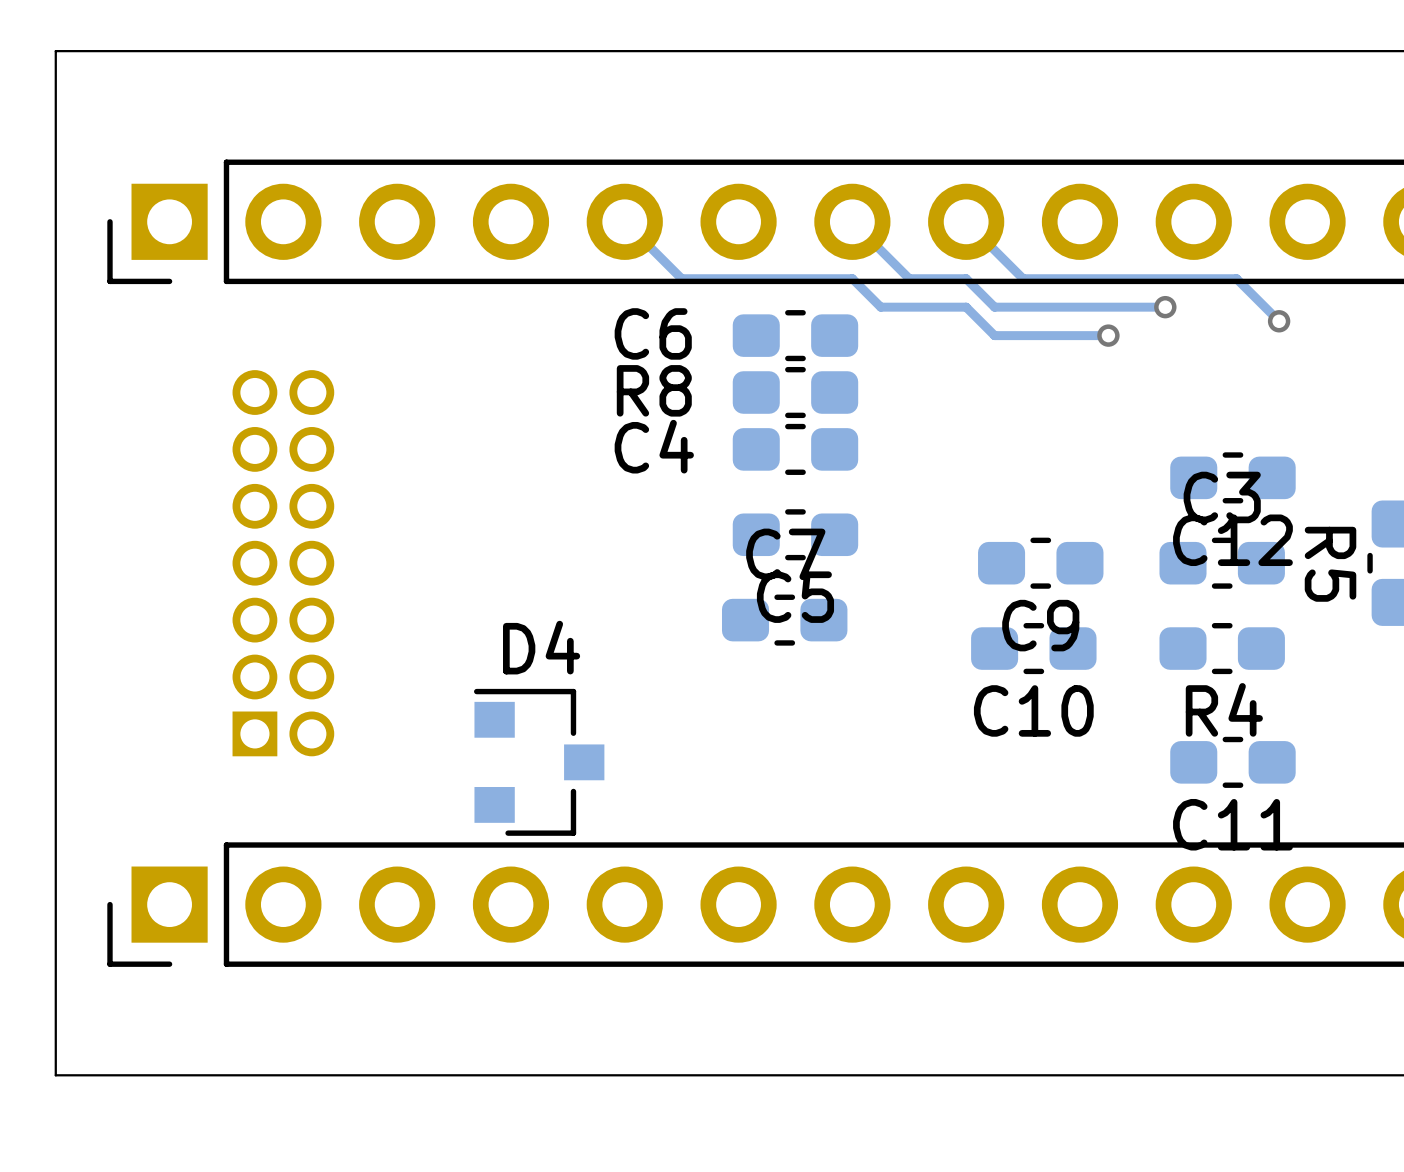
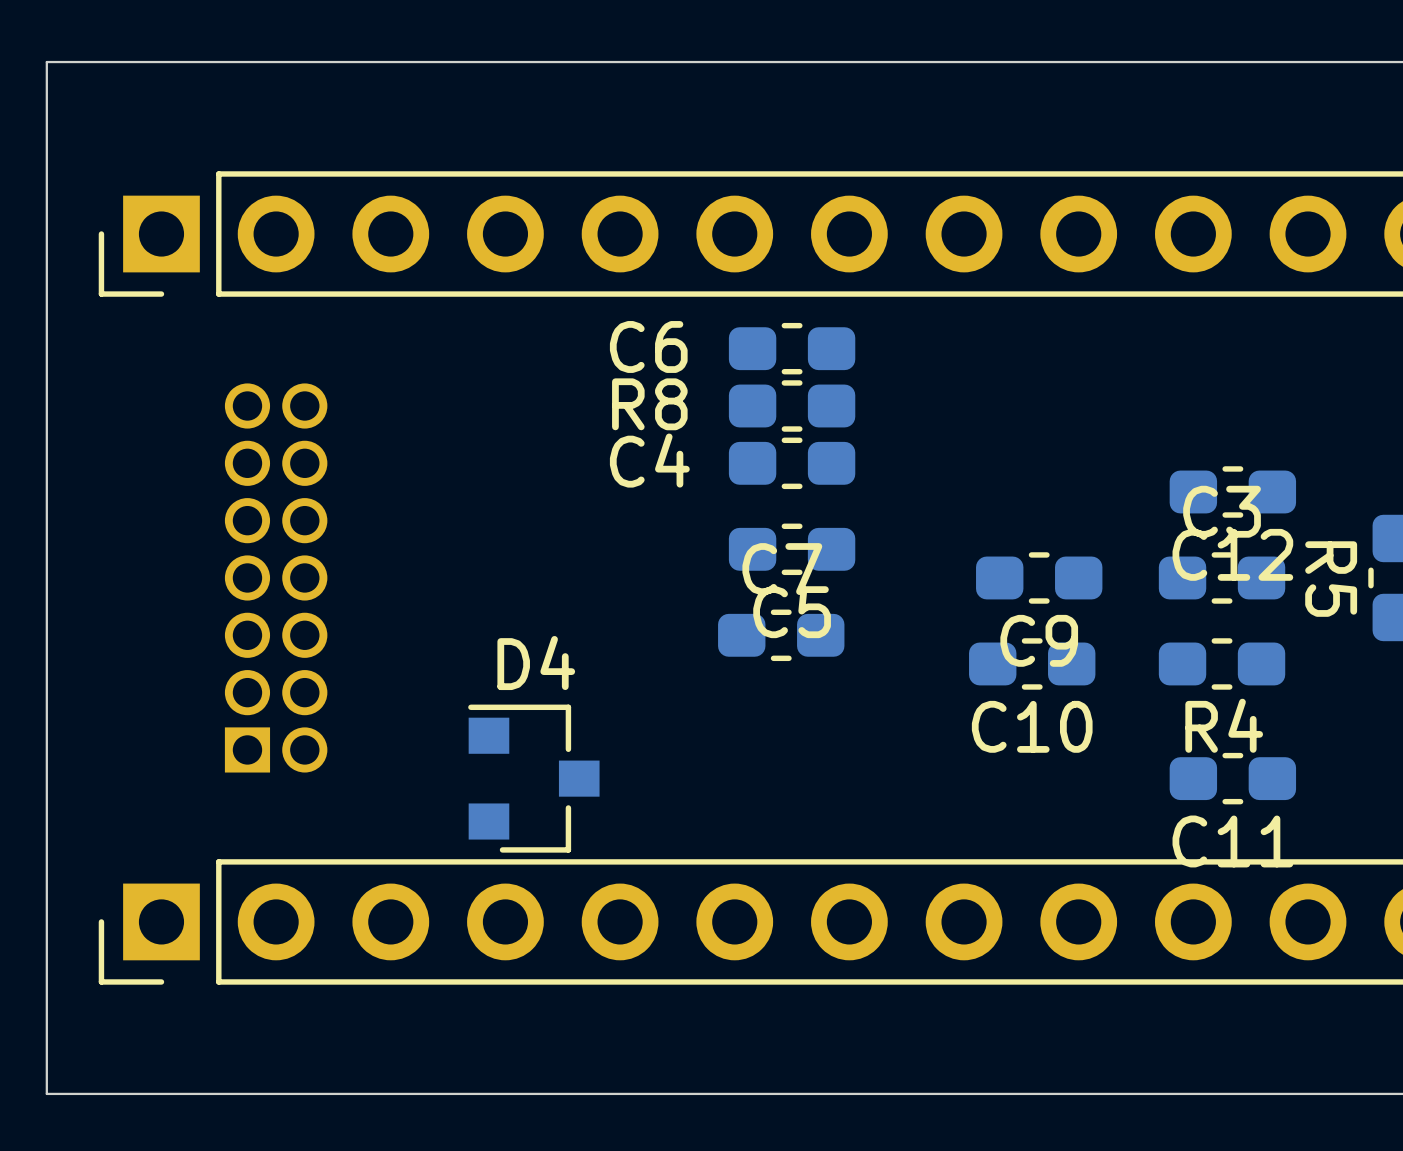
track: (624, 221) (681, 278) (852, 278) (880, 307) (966, 307) (994, 335) (1108, 335) -> none
track: (852, 221) (909, 278) (966, 278) (994, 307) (1165, 307) -> none
track: (966, 221) (1023, 278) (1236, 278) (1279, 321) -> none
via: (1165, 307) -> none
via: (1279, 321) -> none
via: (1108, 335) -> none

